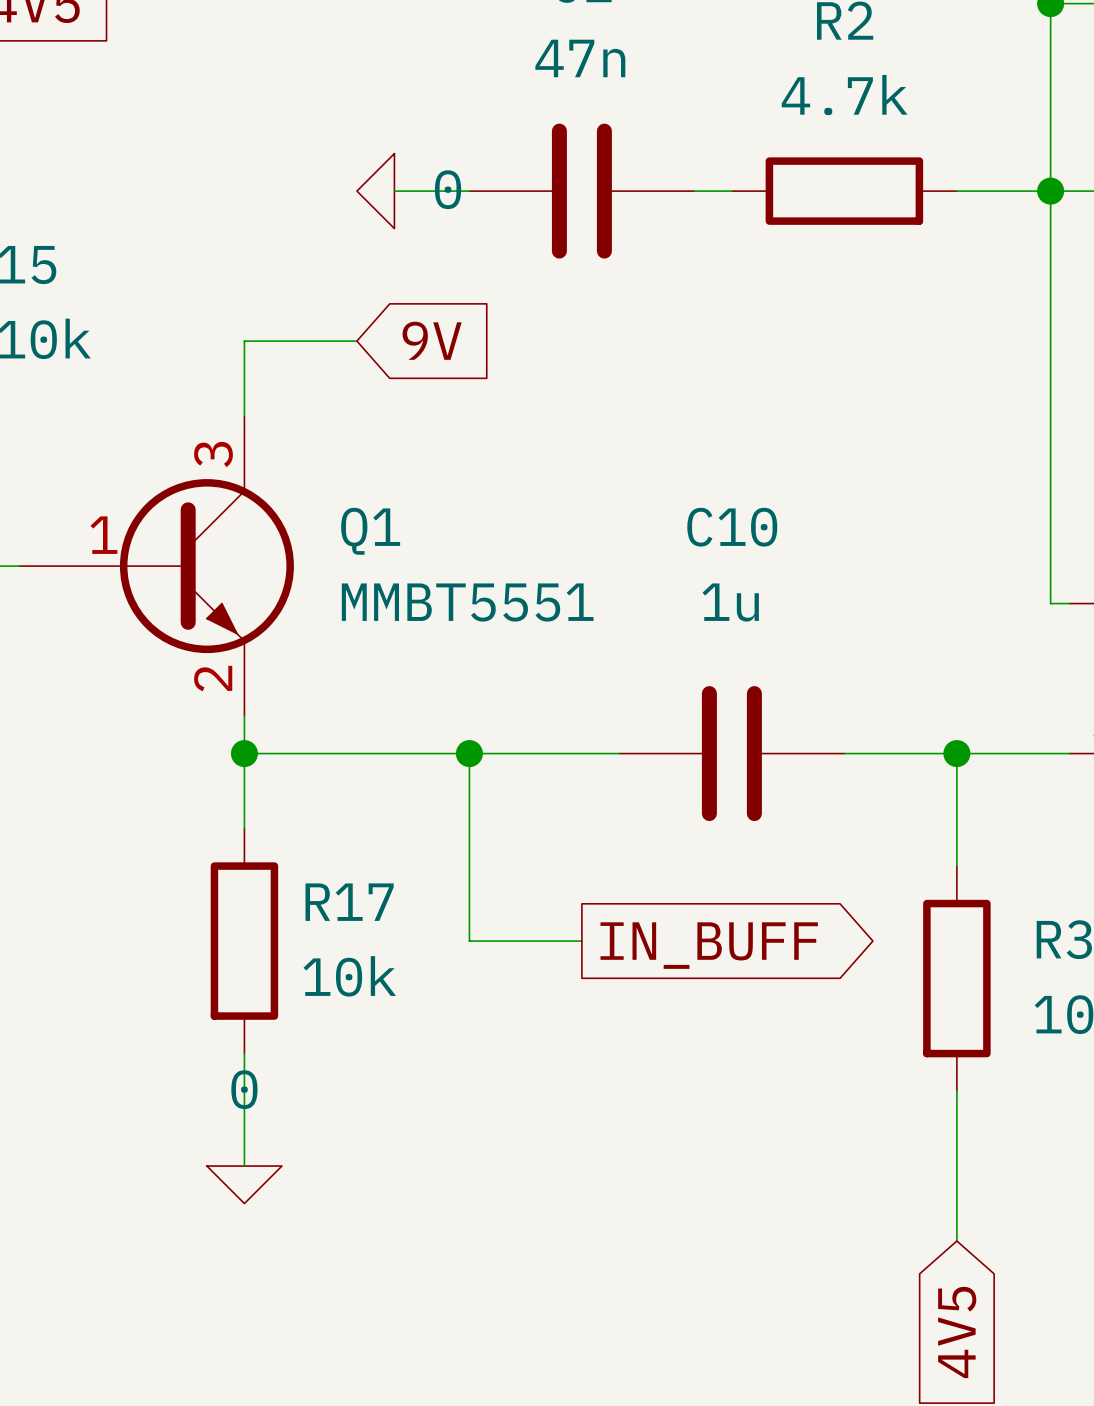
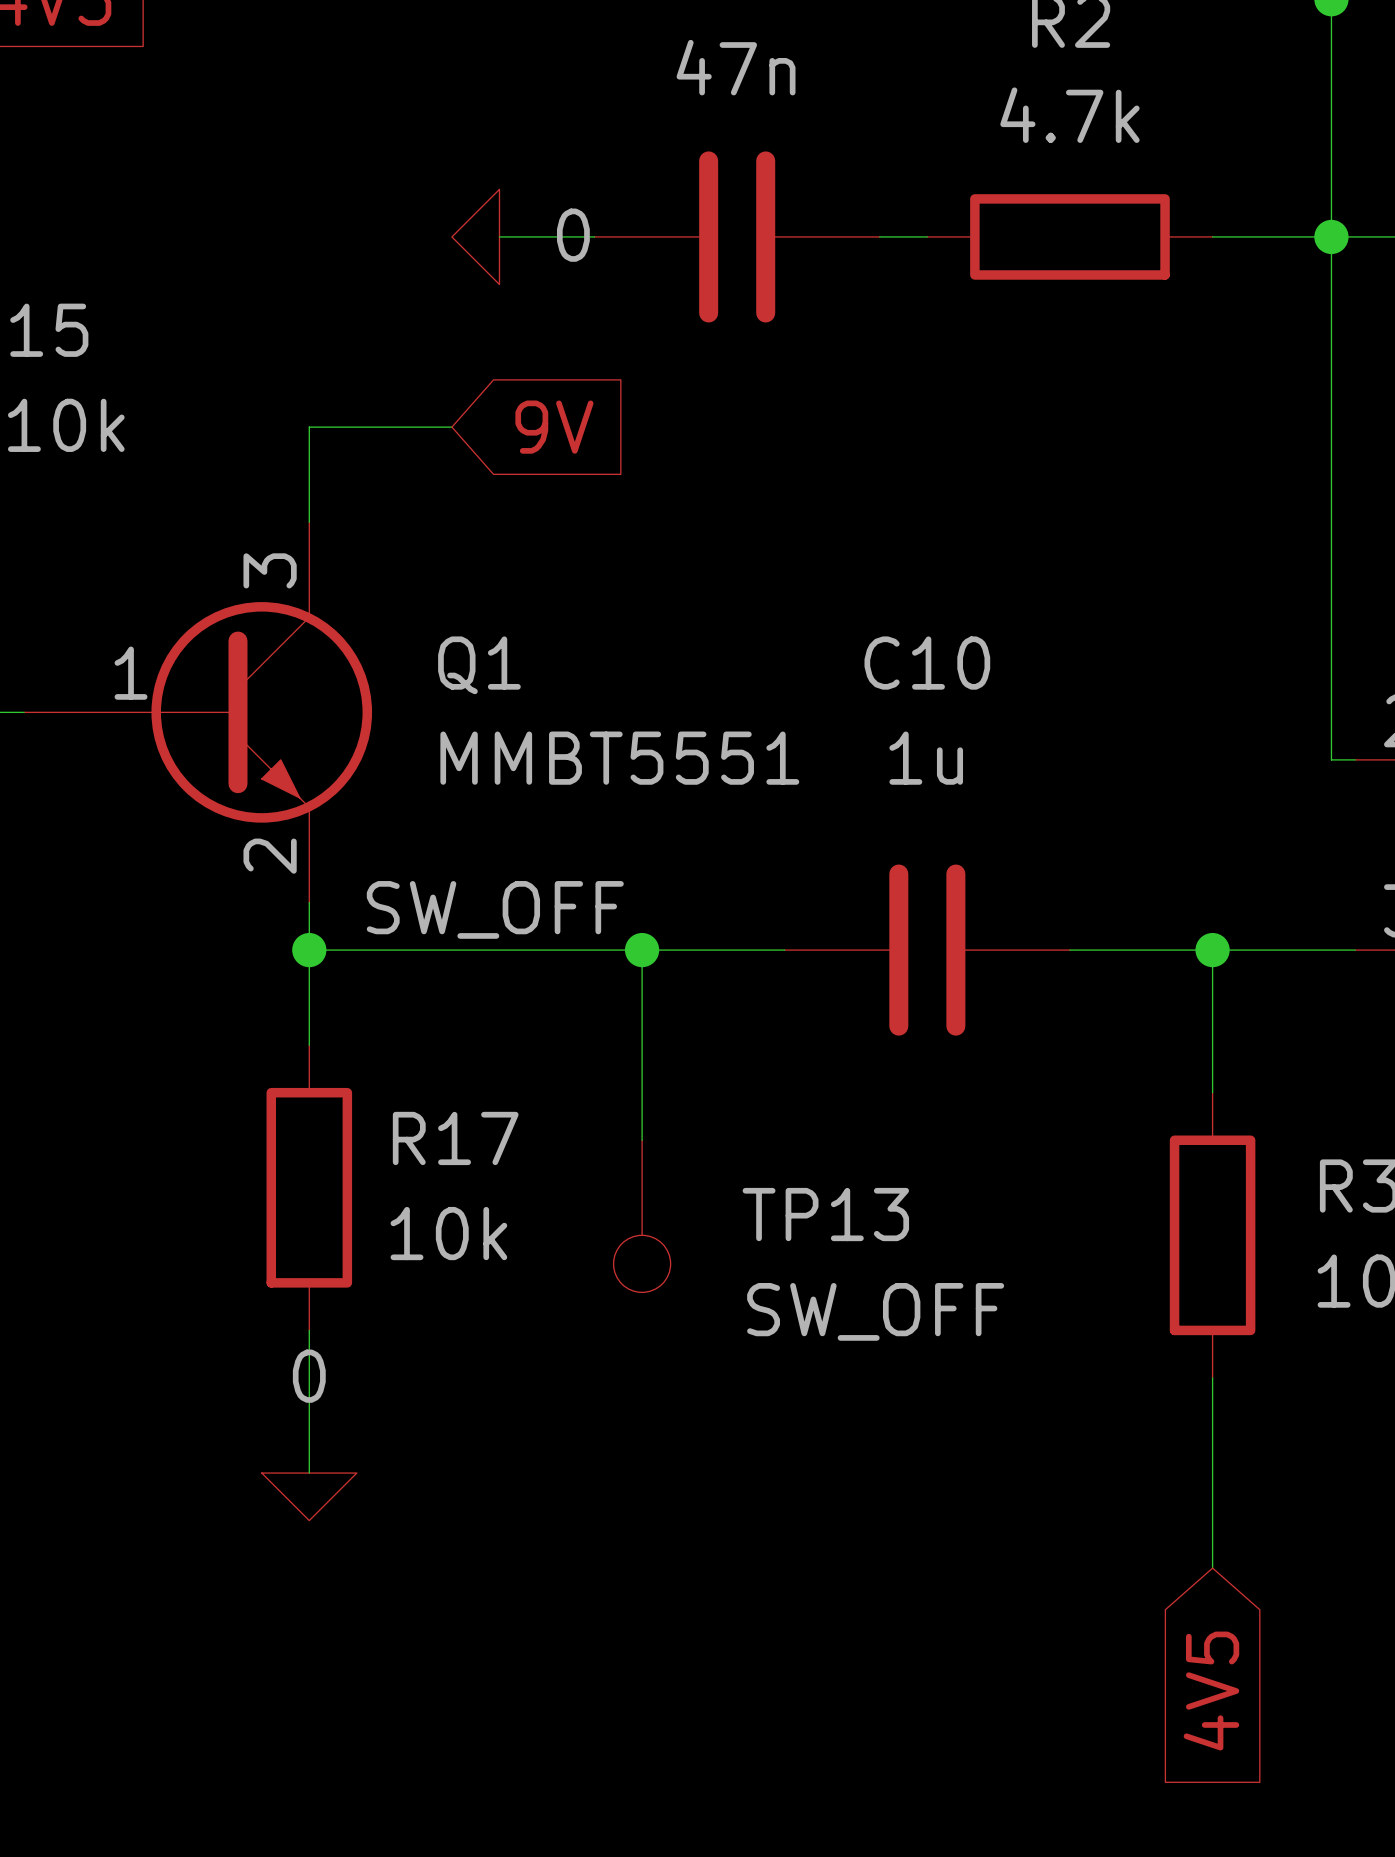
label: none -> SW_OFF (495, 909)
wire: (469, 753) (469, 941) (581, 941) -> none
junction position: (469, 753) -> (642, 950)
wire: none -> (642, 950) (642, 1140)
global label: IN_BUFF (709, 945) -> none
TP13: none -> SW_OFF (642, 1216)

